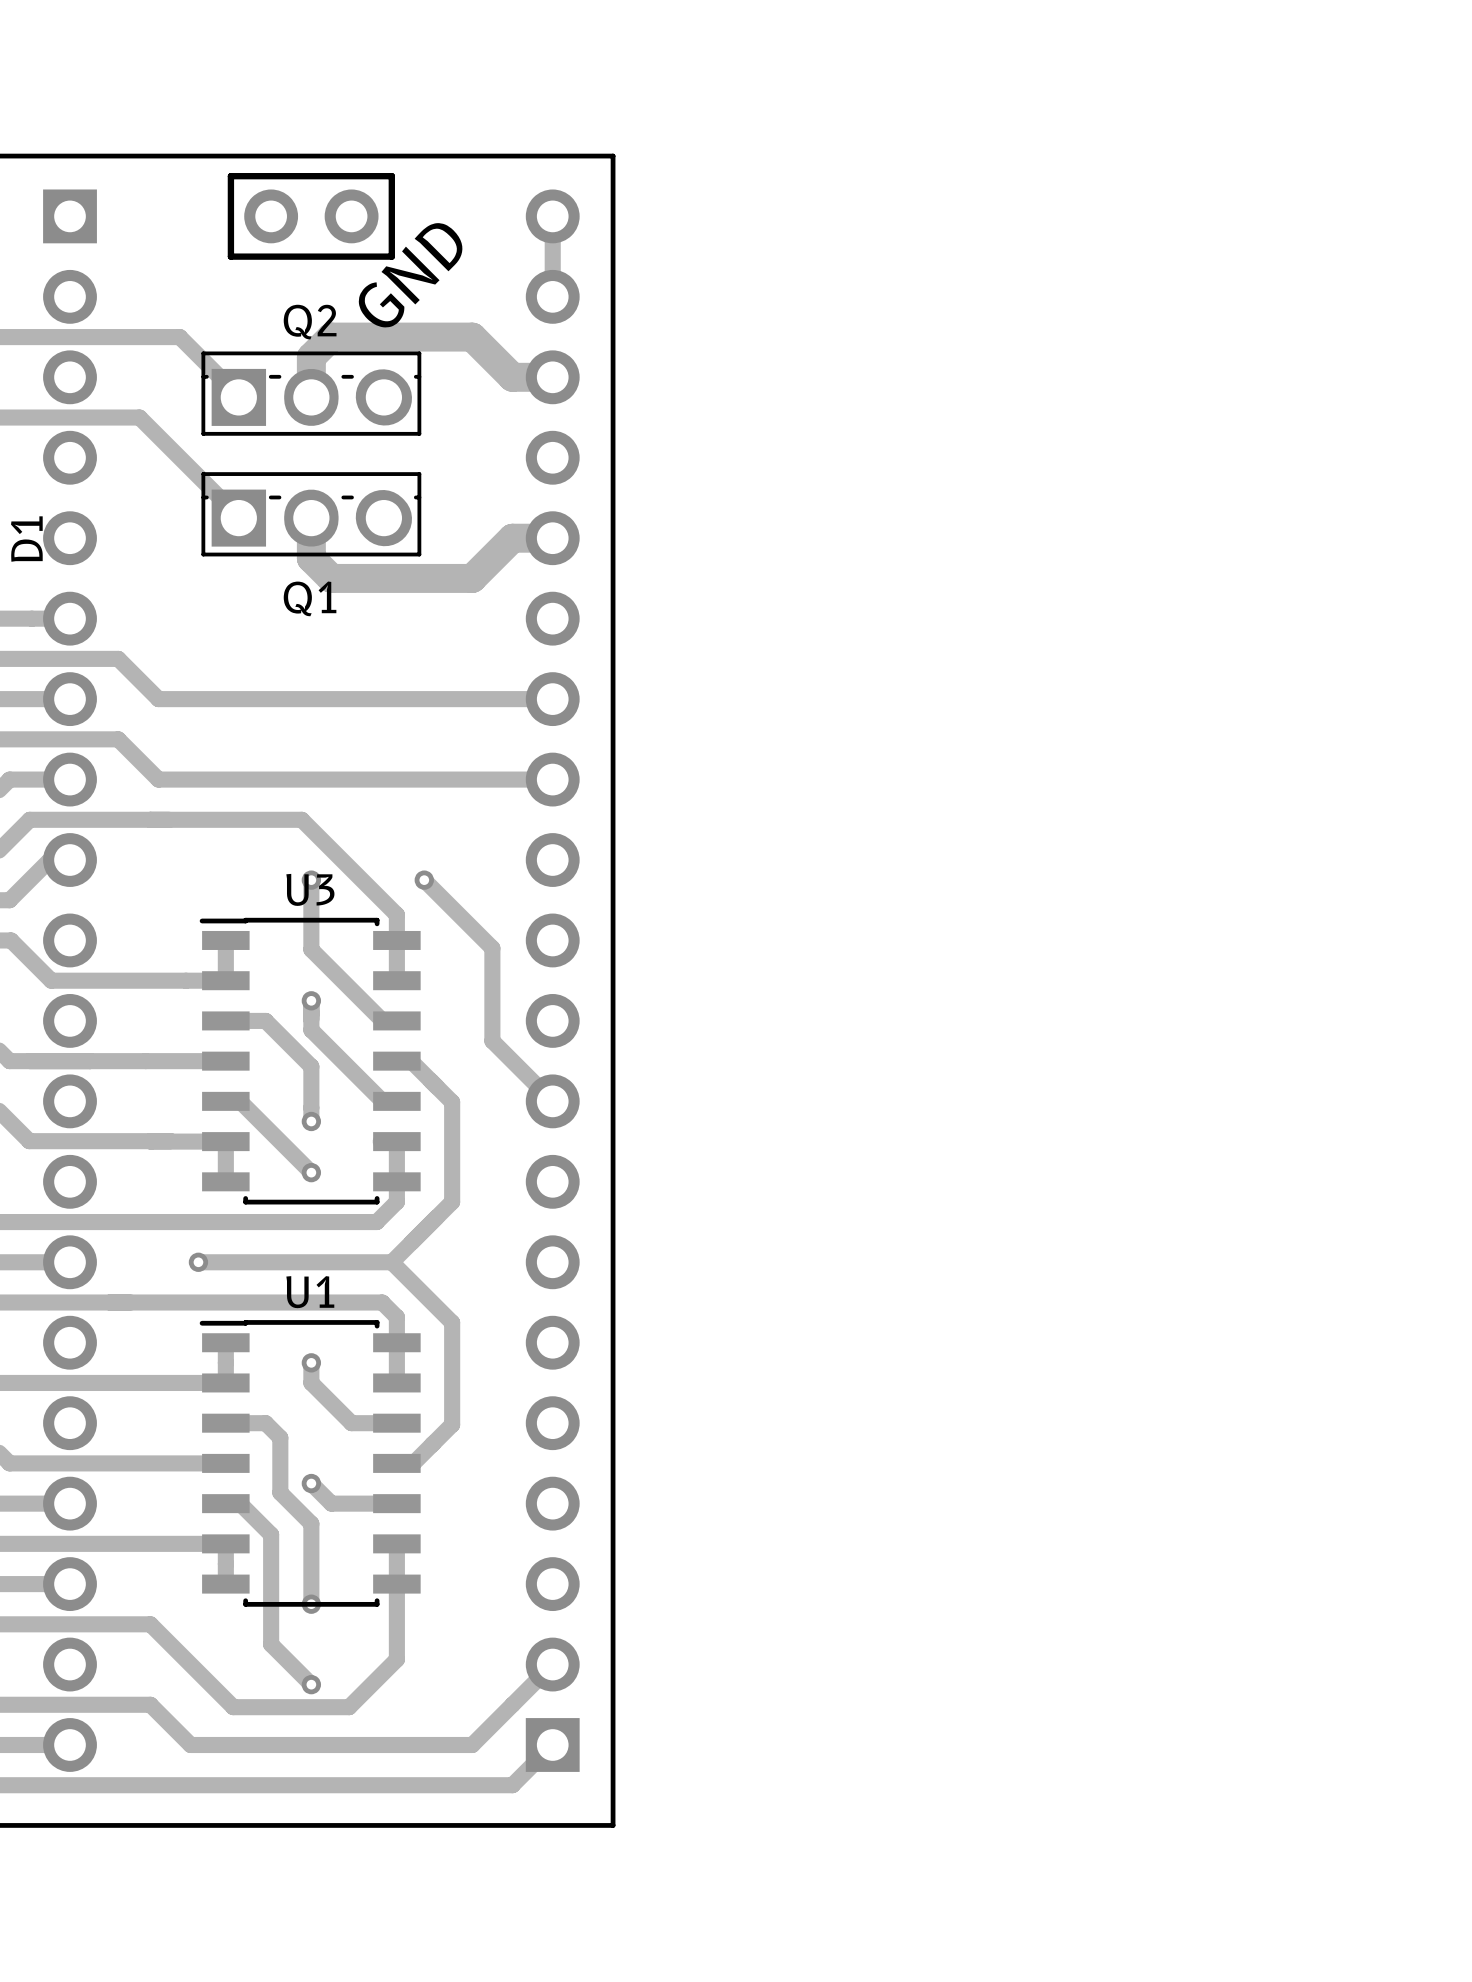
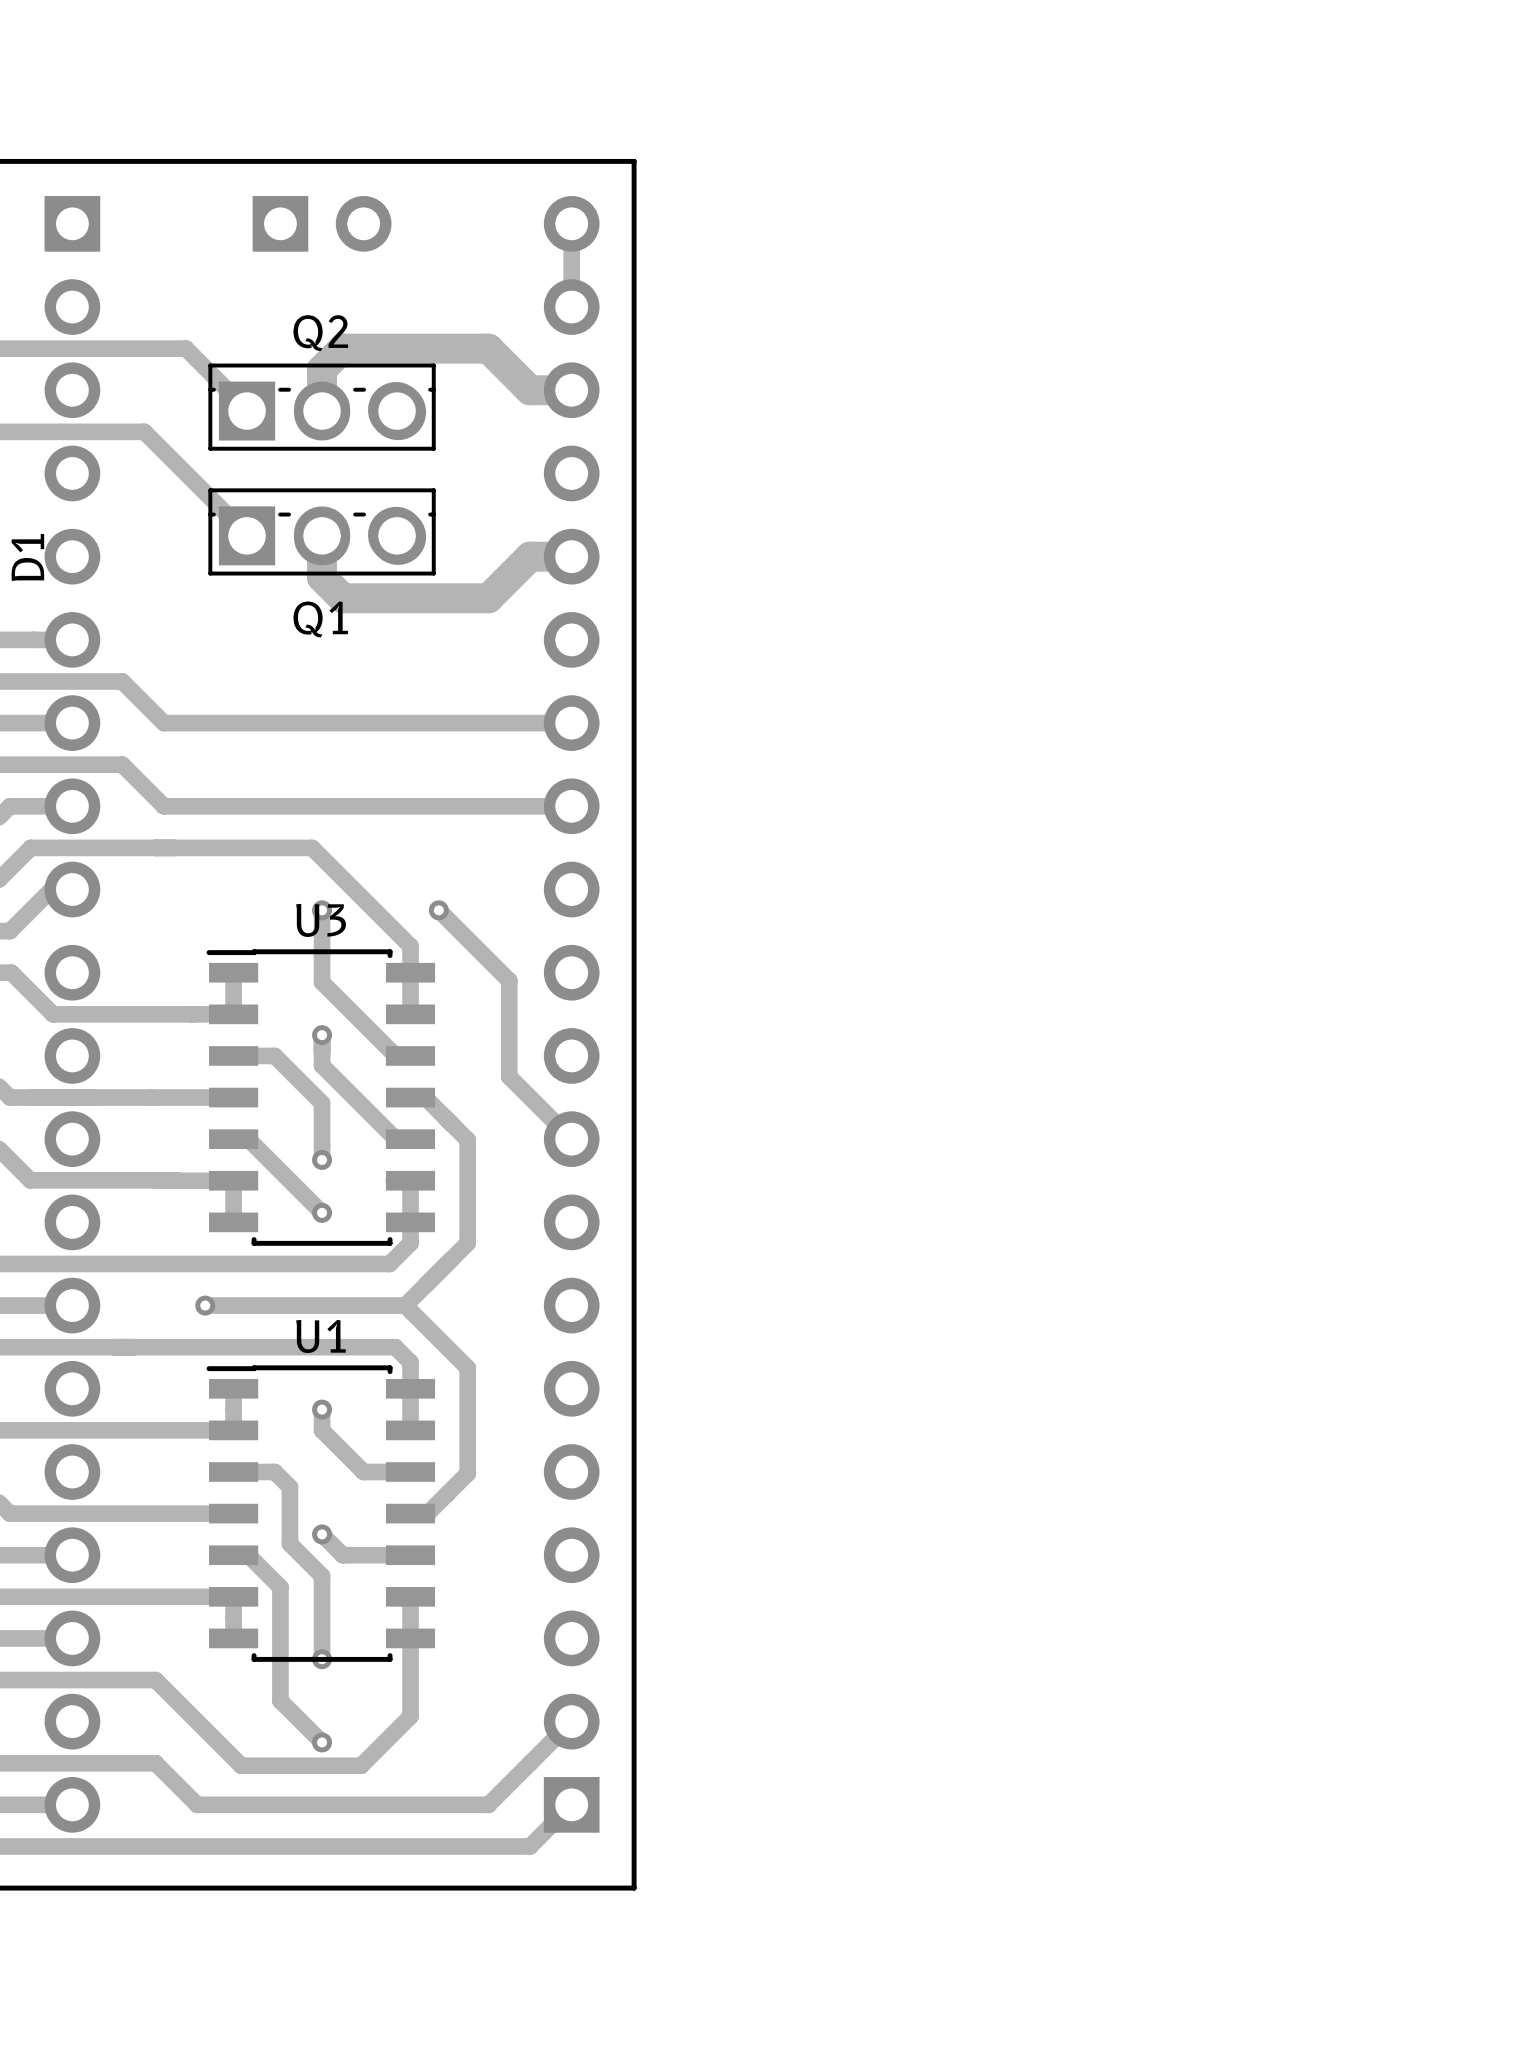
line: (230, 176) (230, 256) (391, 256) (391, 176) (230, 176) -> none
part footprint: [244, 189, 379, 244] -> [252, 195, 392, 252]
text: GND (410, 275) -> none

